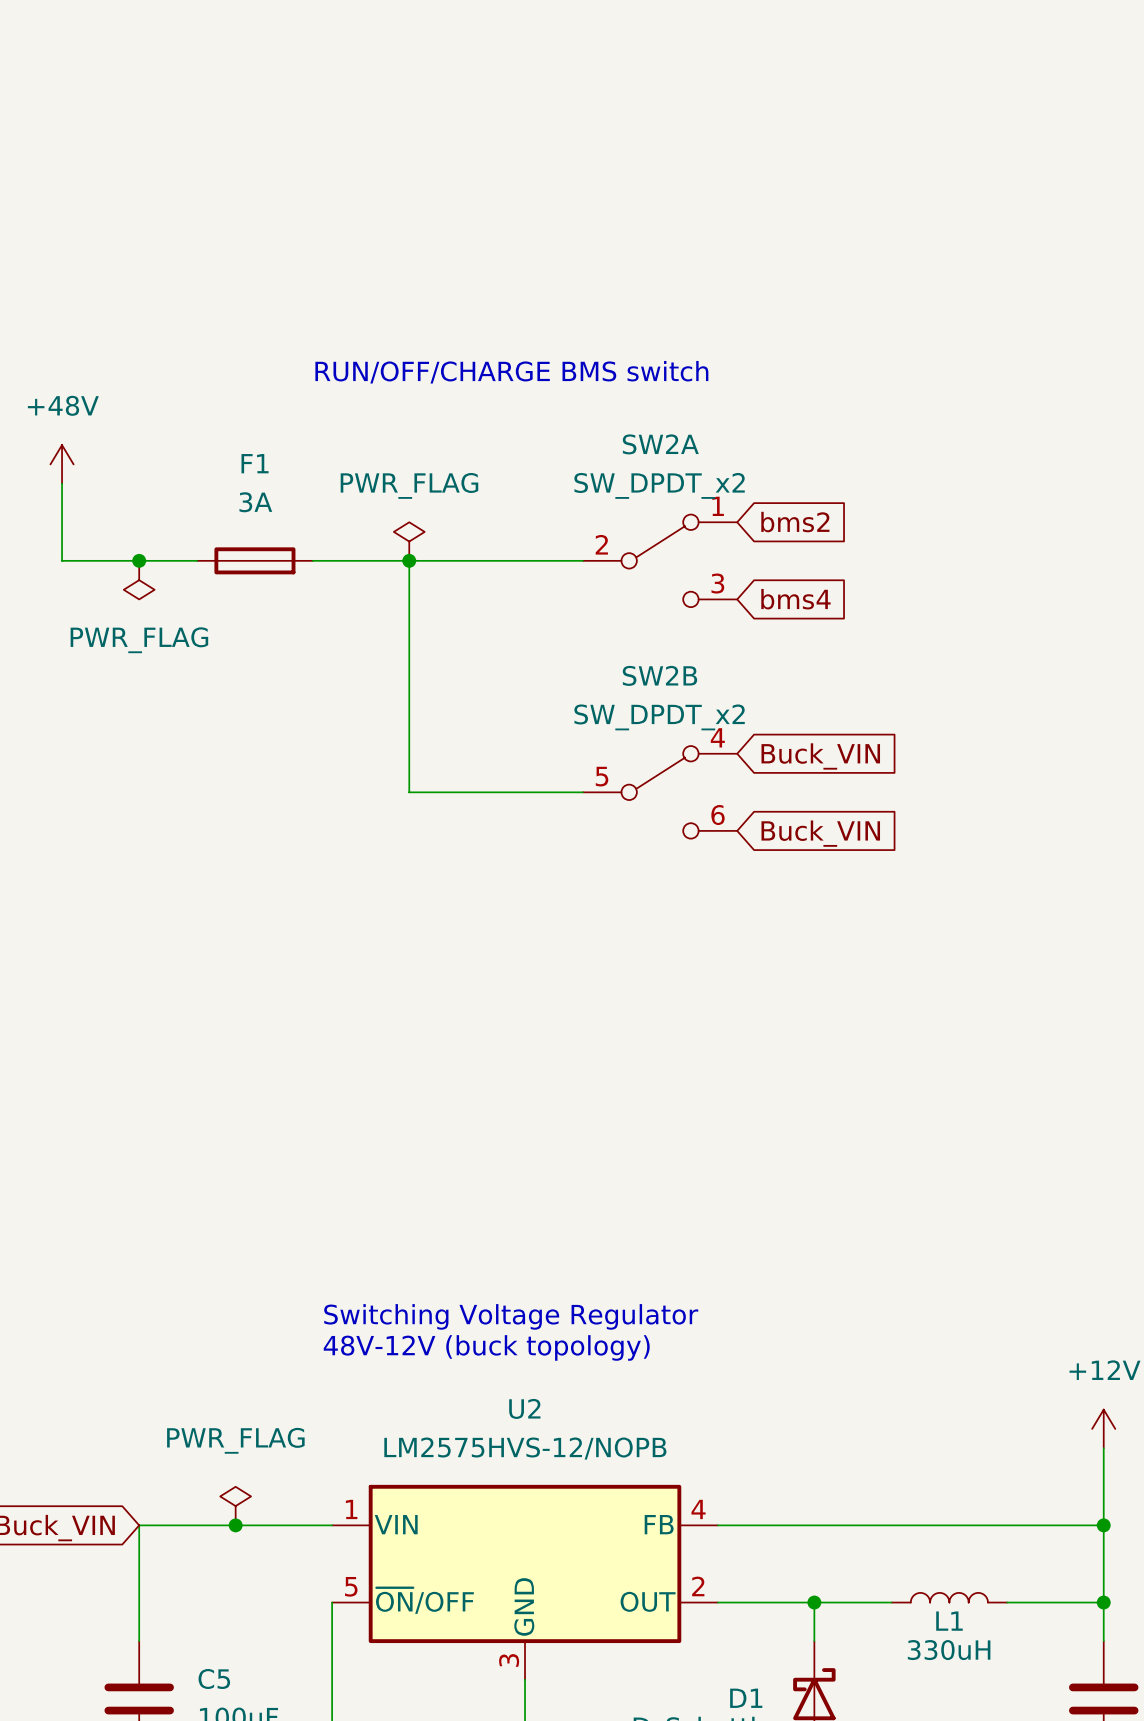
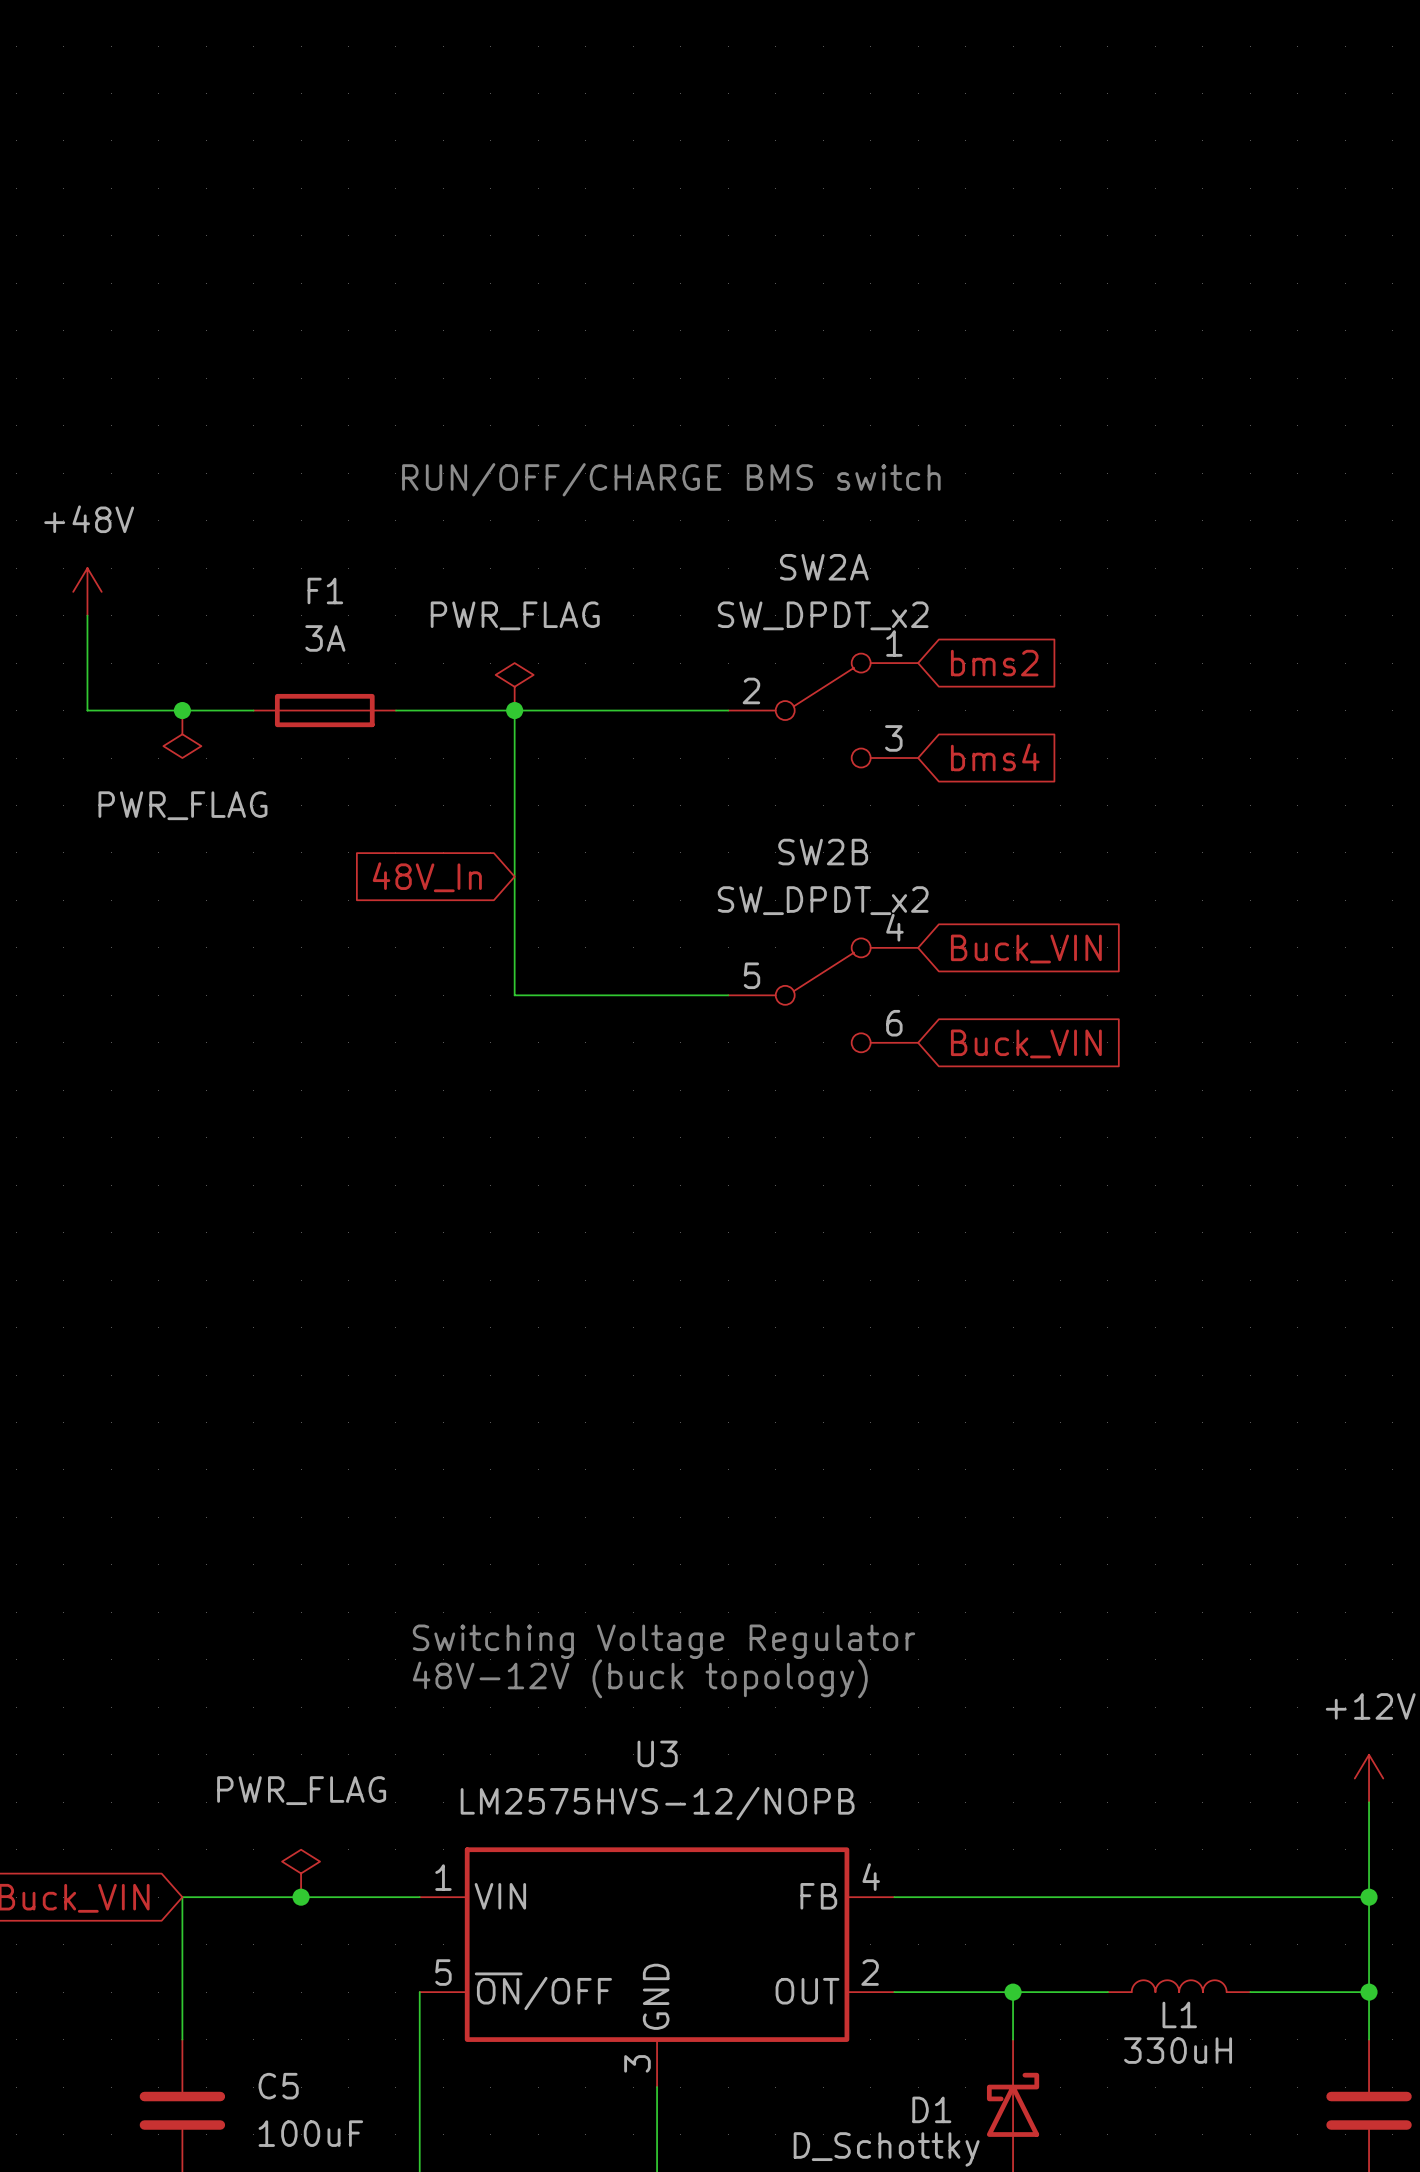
global label: none -> 48V_In (427, 877)
U2 name: U2 (524, 1408) -> U3 (657, 1753)

